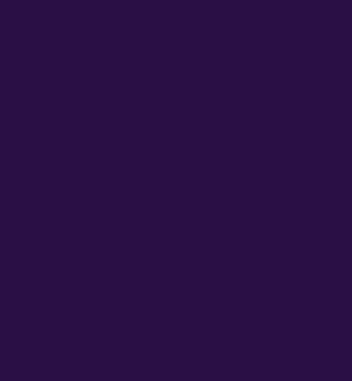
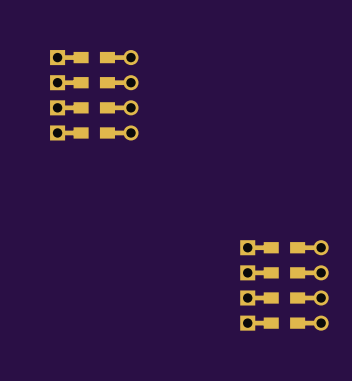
part: none -> (94, 57)
part: none -> (94, 82)
part: none -> (94, 107)
part: none -> (94, 132)
part: none -> (284, 247)
part: none -> (284, 272)
part: none -> (284, 297)
part: none -> (284, 323)

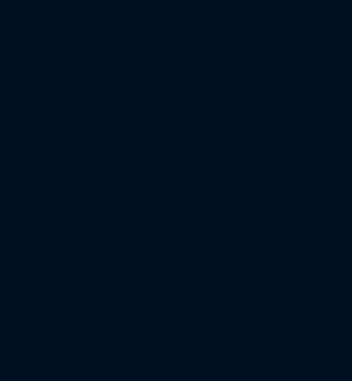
part: (94, 57) -> none
part: (94, 82) -> none
part: (94, 107) -> none
part: (94, 132) -> none
part: (284, 247) -> none
part: (284, 272) -> none
part: (284, 297) -> none
part: (284, 323) -> none

